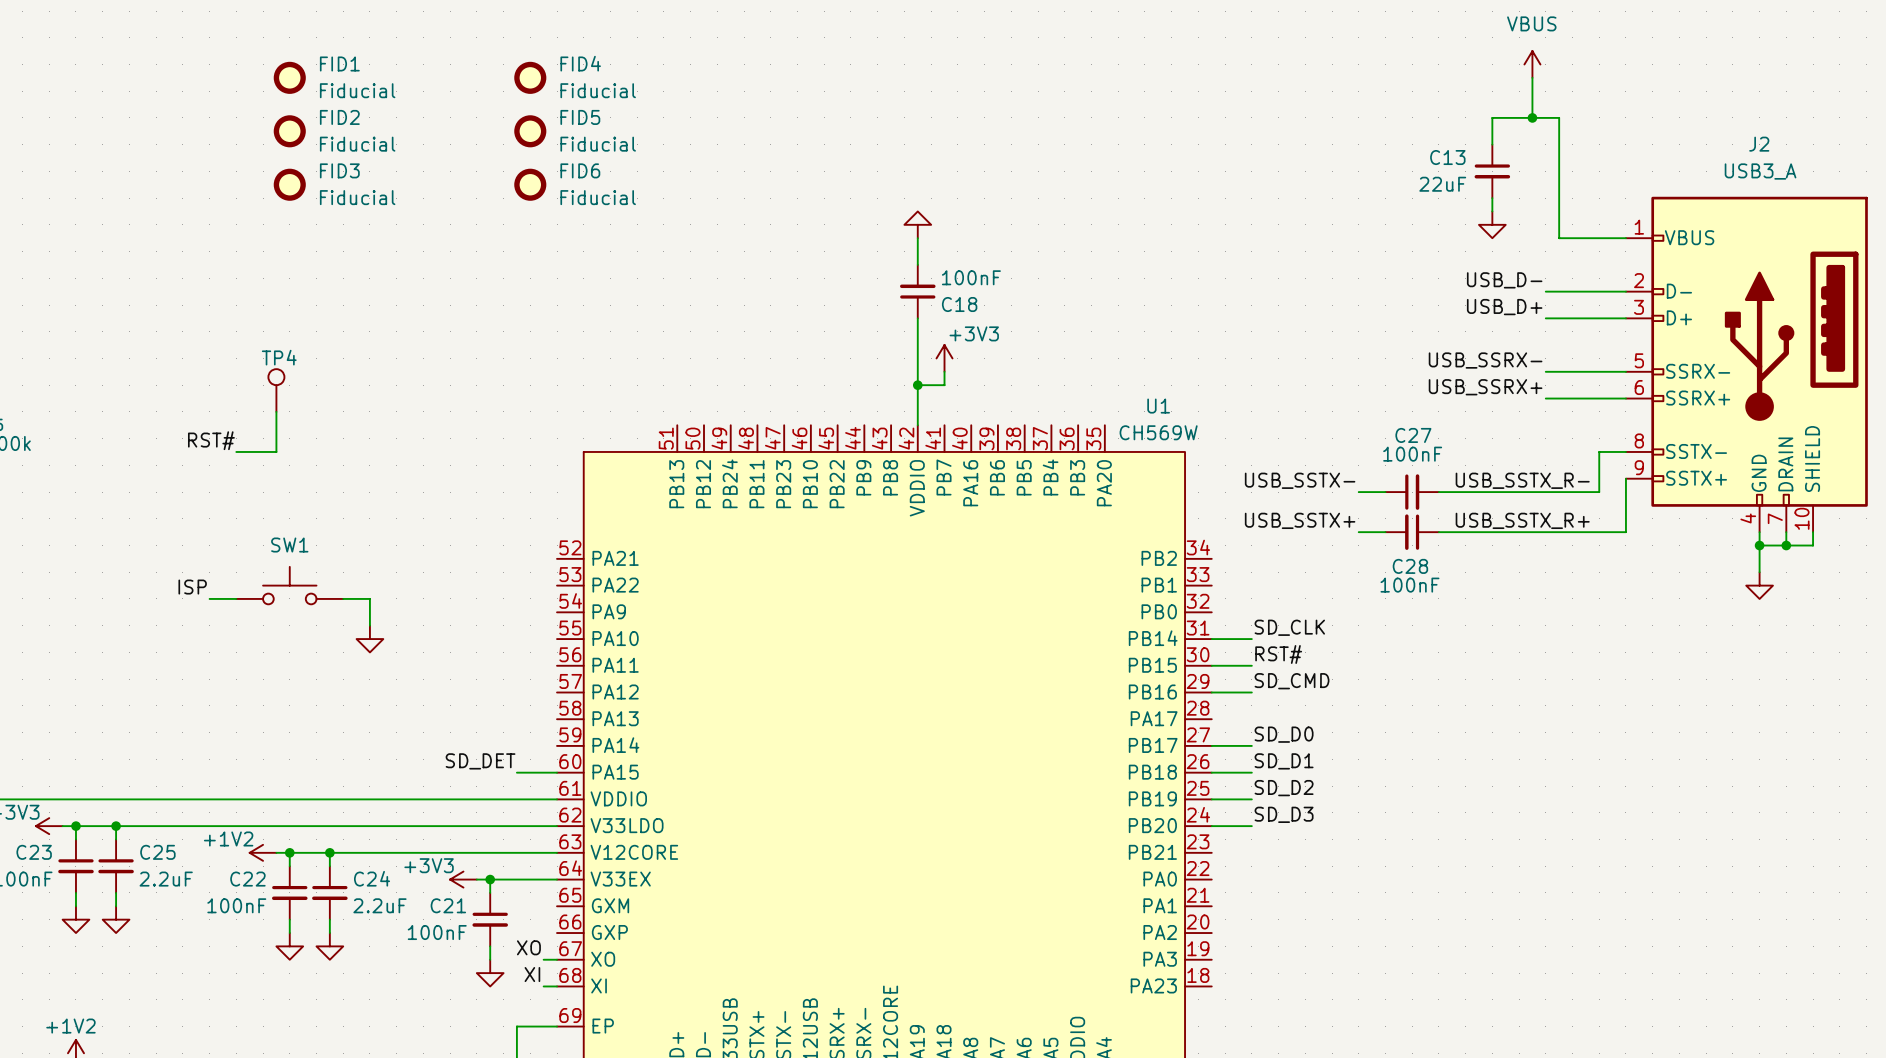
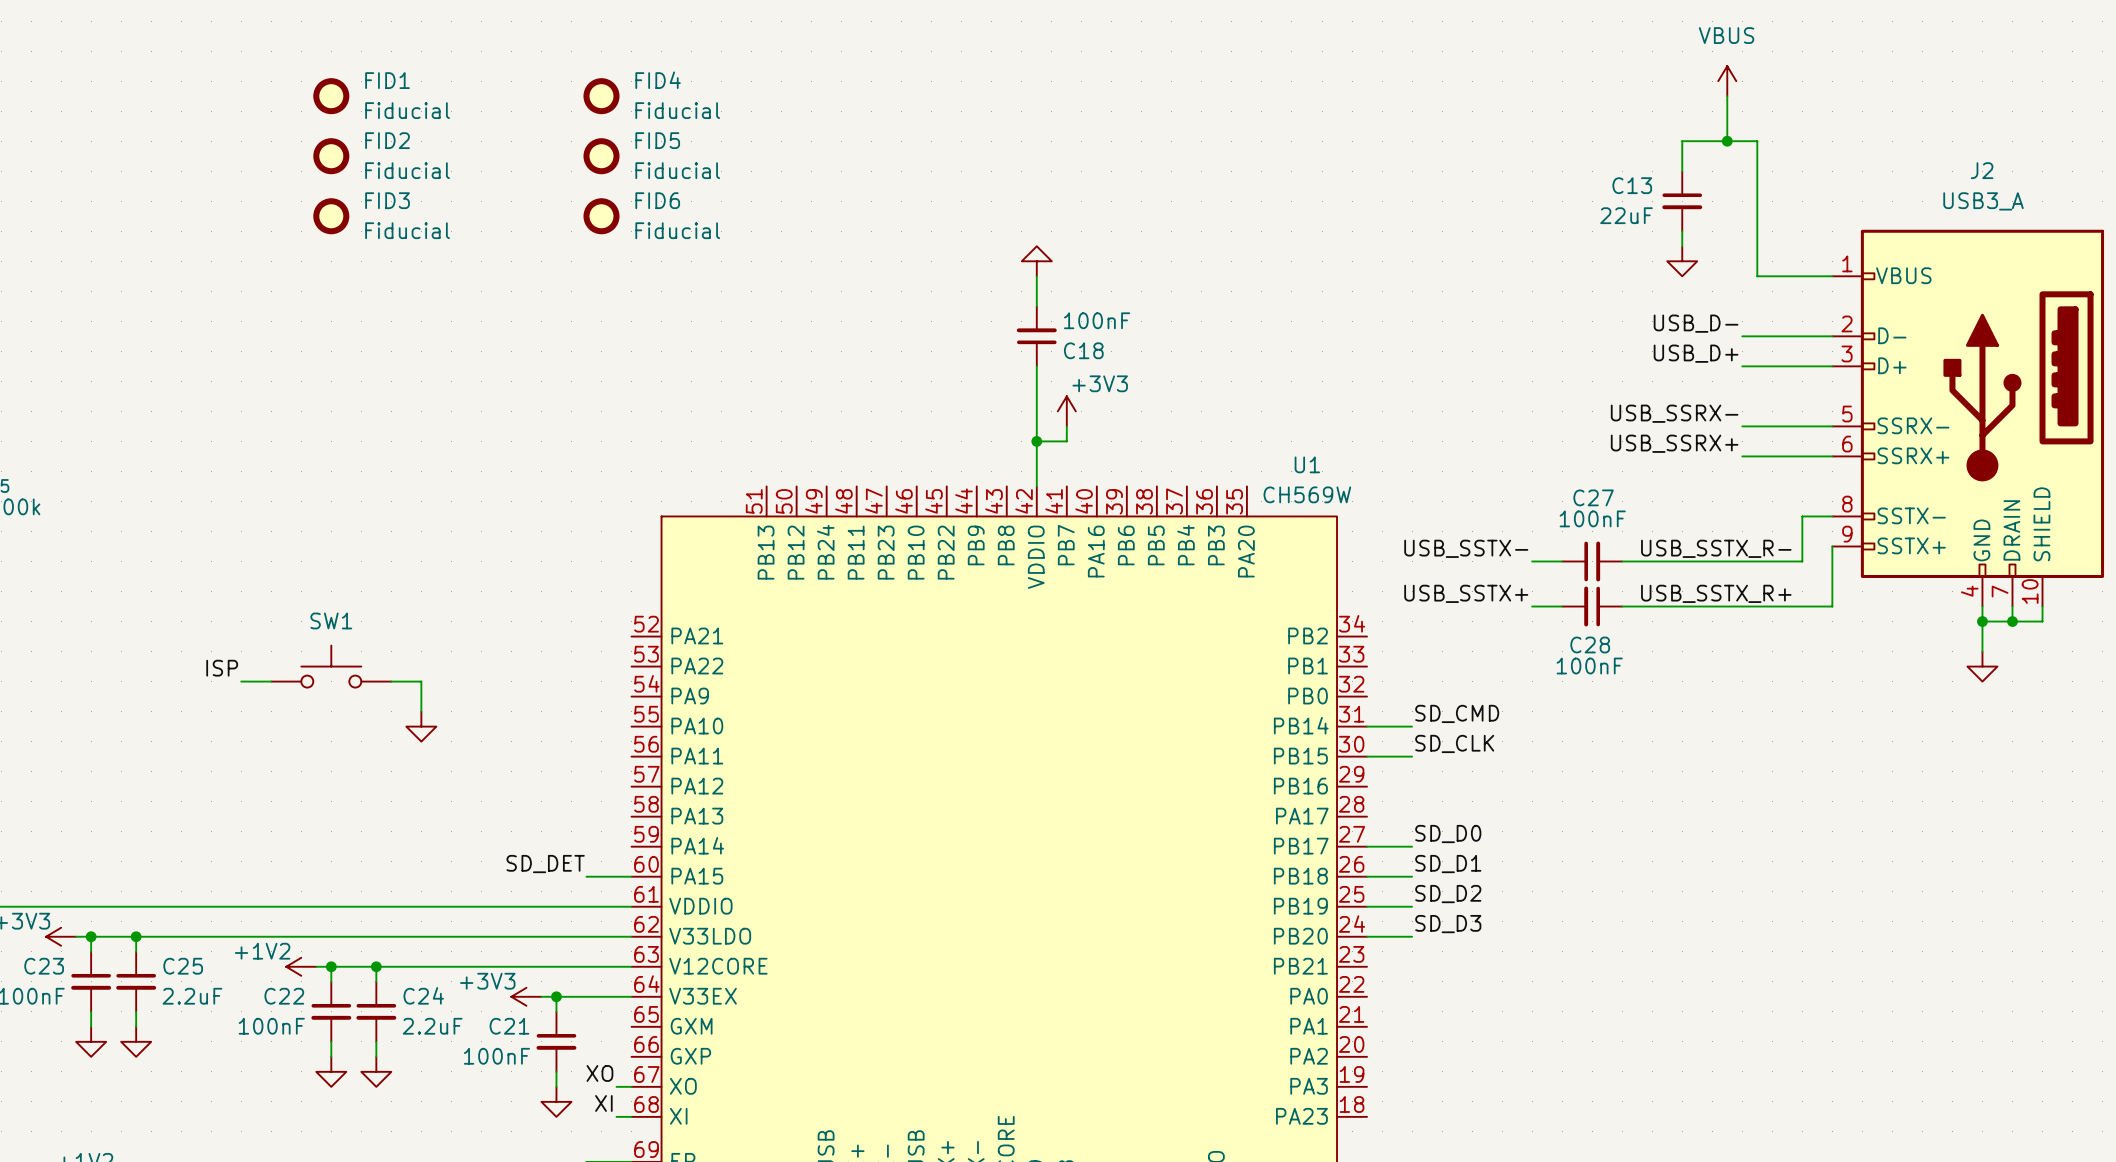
TP4: (276, 390) -> none
wire: (276, 411) (276, 451) (236, 451) -> none
label: RST# (211, 440) -> none
label: SD_CLK (1289, 627) -> SD_CMD (1457, 713)
label: RST# (1278, 654) -> SD_CLK (1454, 743)
label: SD_CMD (1292, 681) -> none
wire: (1211, 692) (1251, 692) -> none

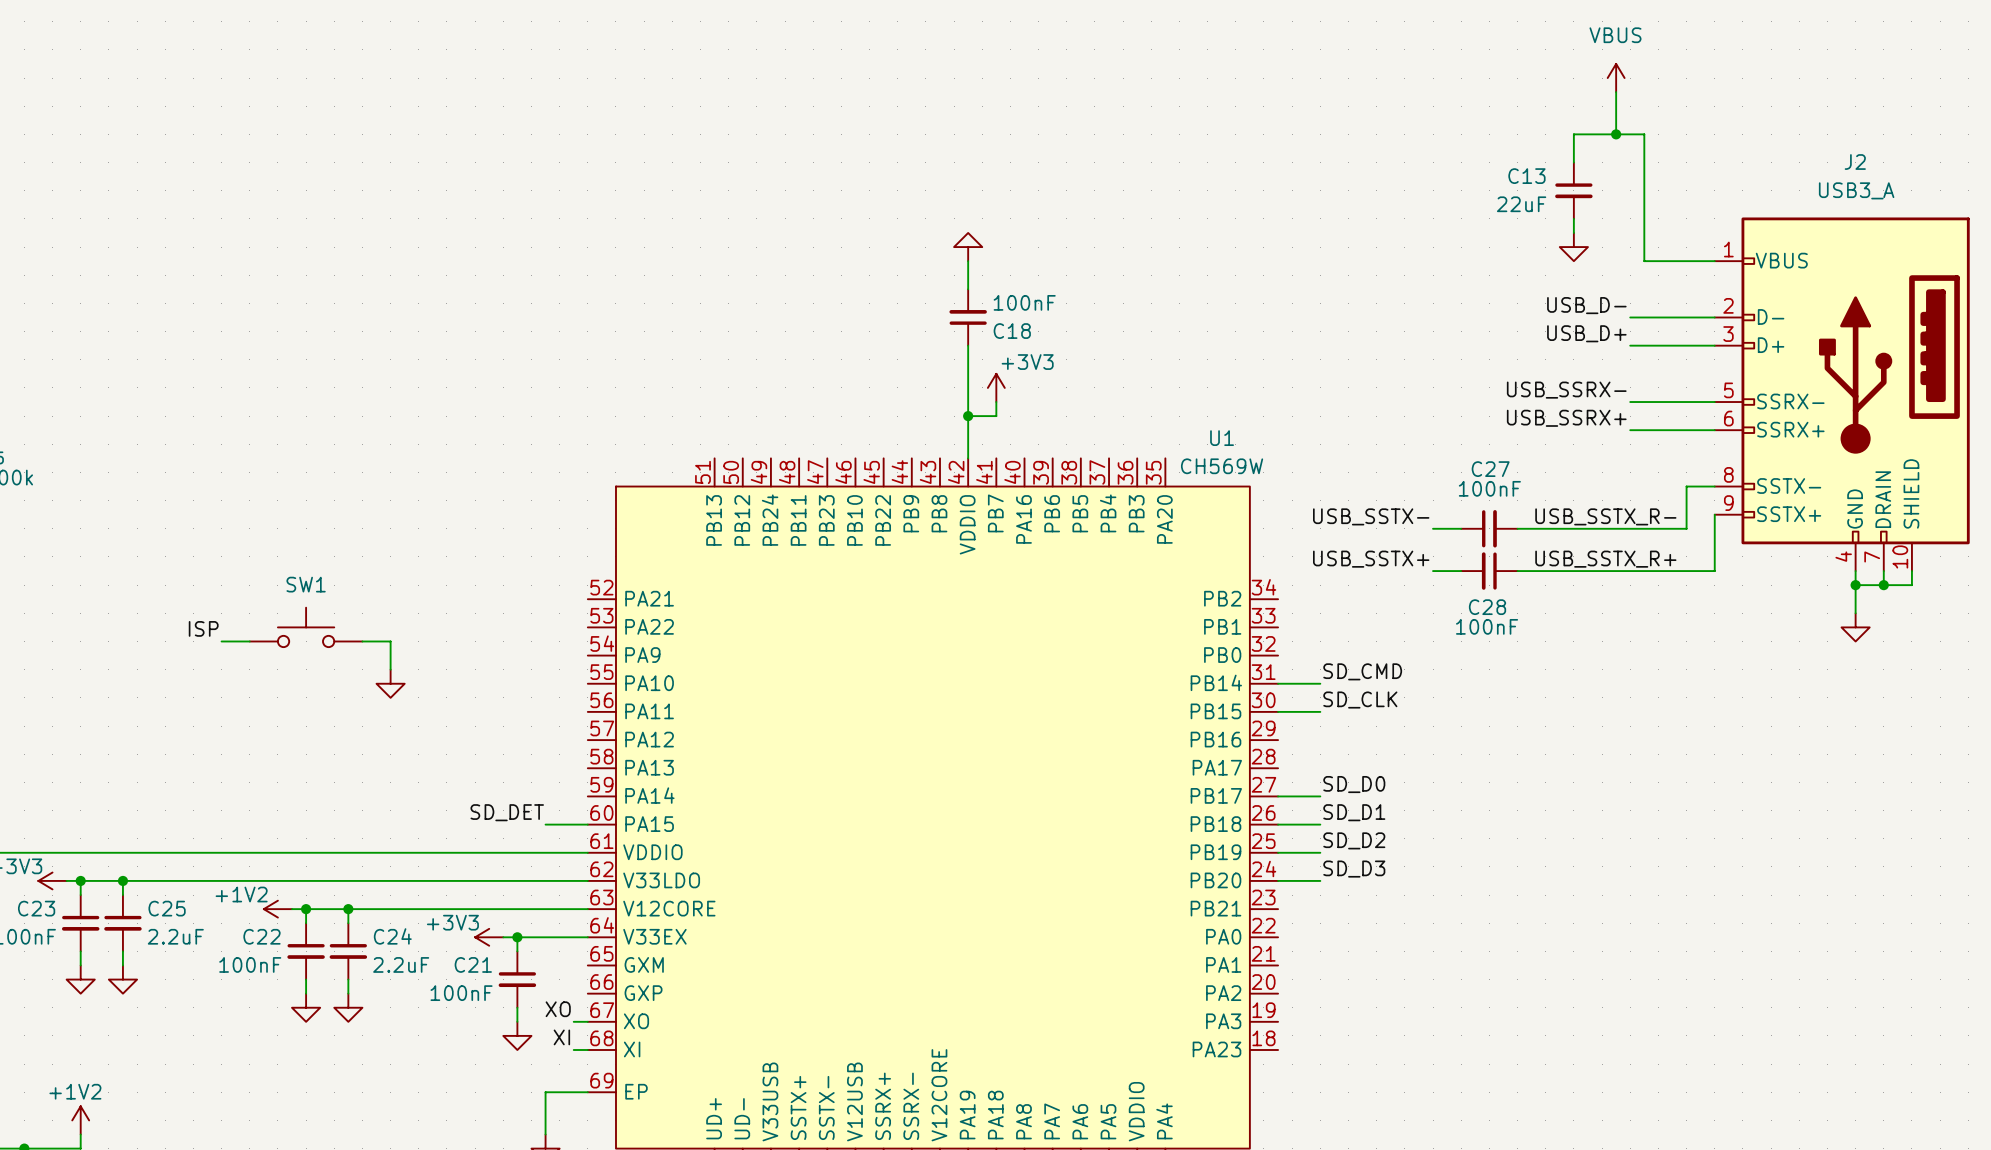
FID1: Fiducial (331, 96) -> none
FID4: Fiducial (601, 96) -> none
FID2: Fiducial (331, 156) -> none
FID5: Fiducial (601, 156) -> none
FID3: Fiducial (331, 216) -> none
FID6: Fiducial (601, 216) -> none

